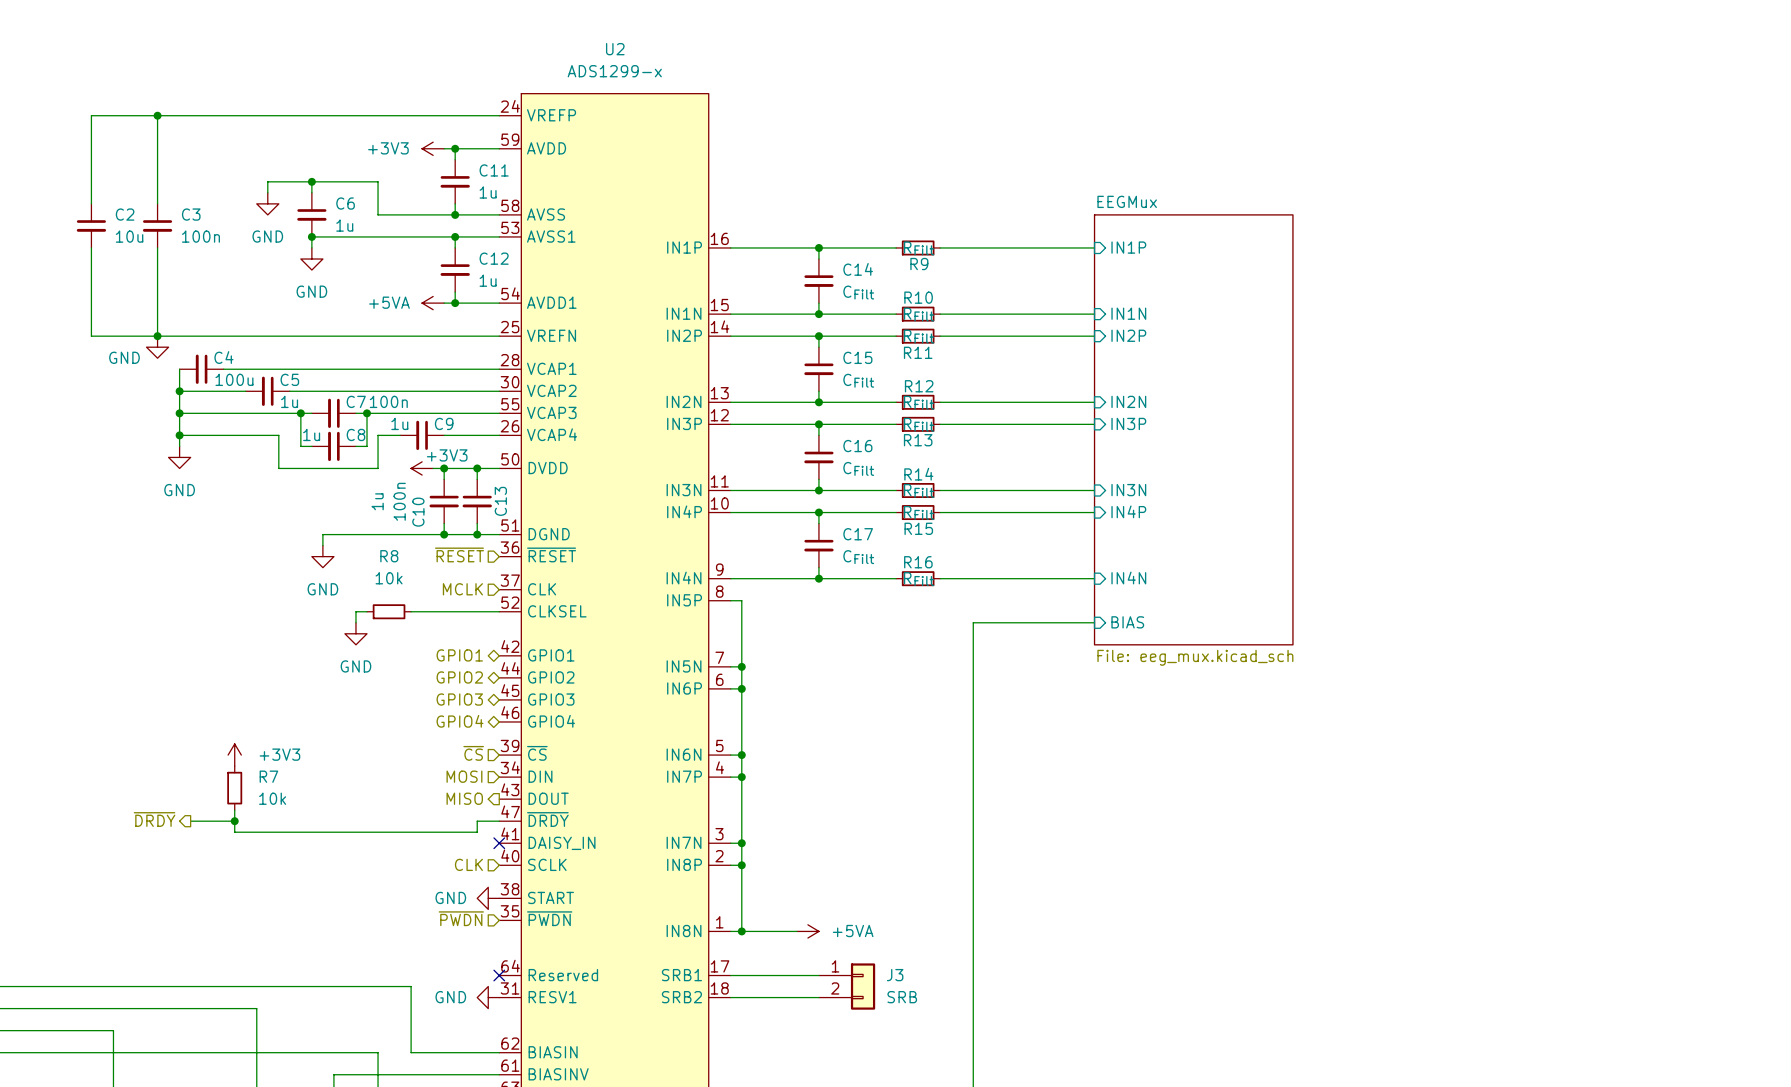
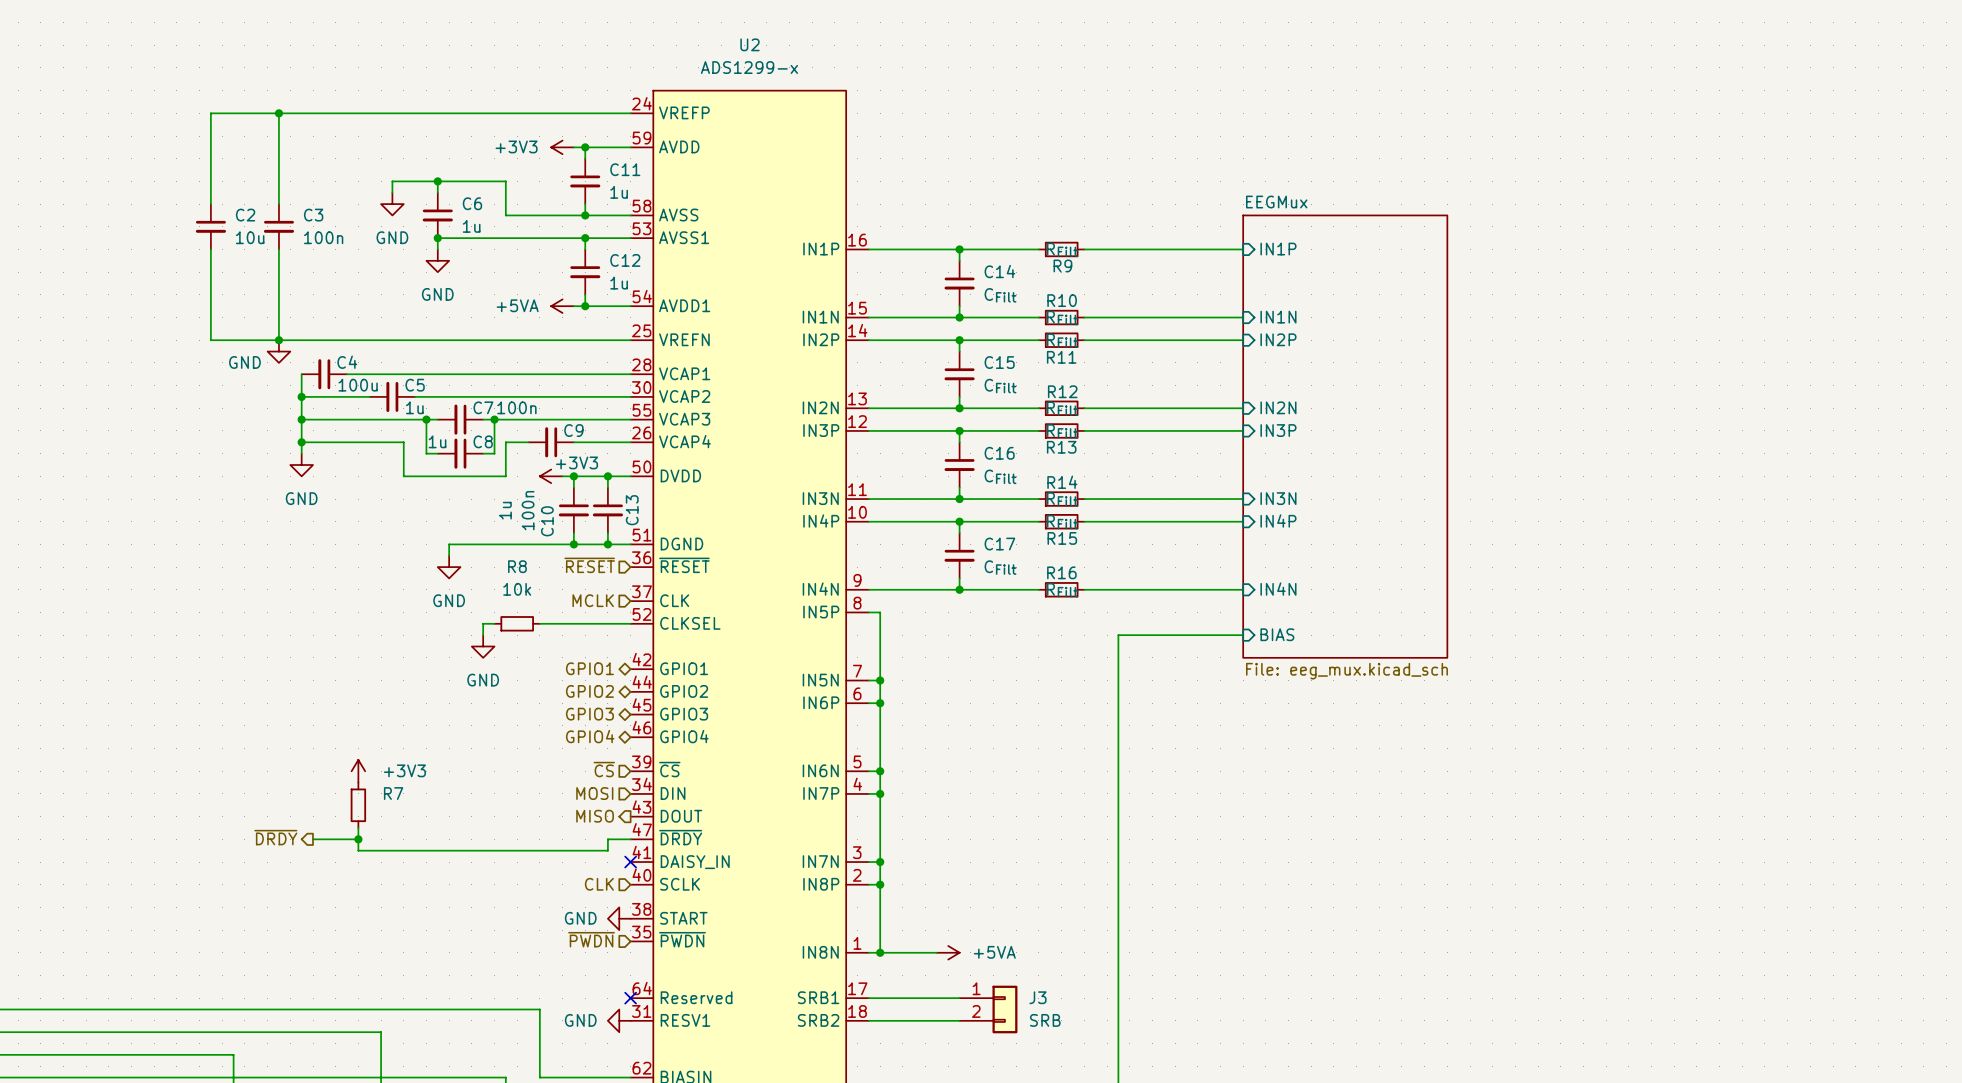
C9 value: 1u (399, 423) -> none
R7 value: 10k (272, 798) -> none

